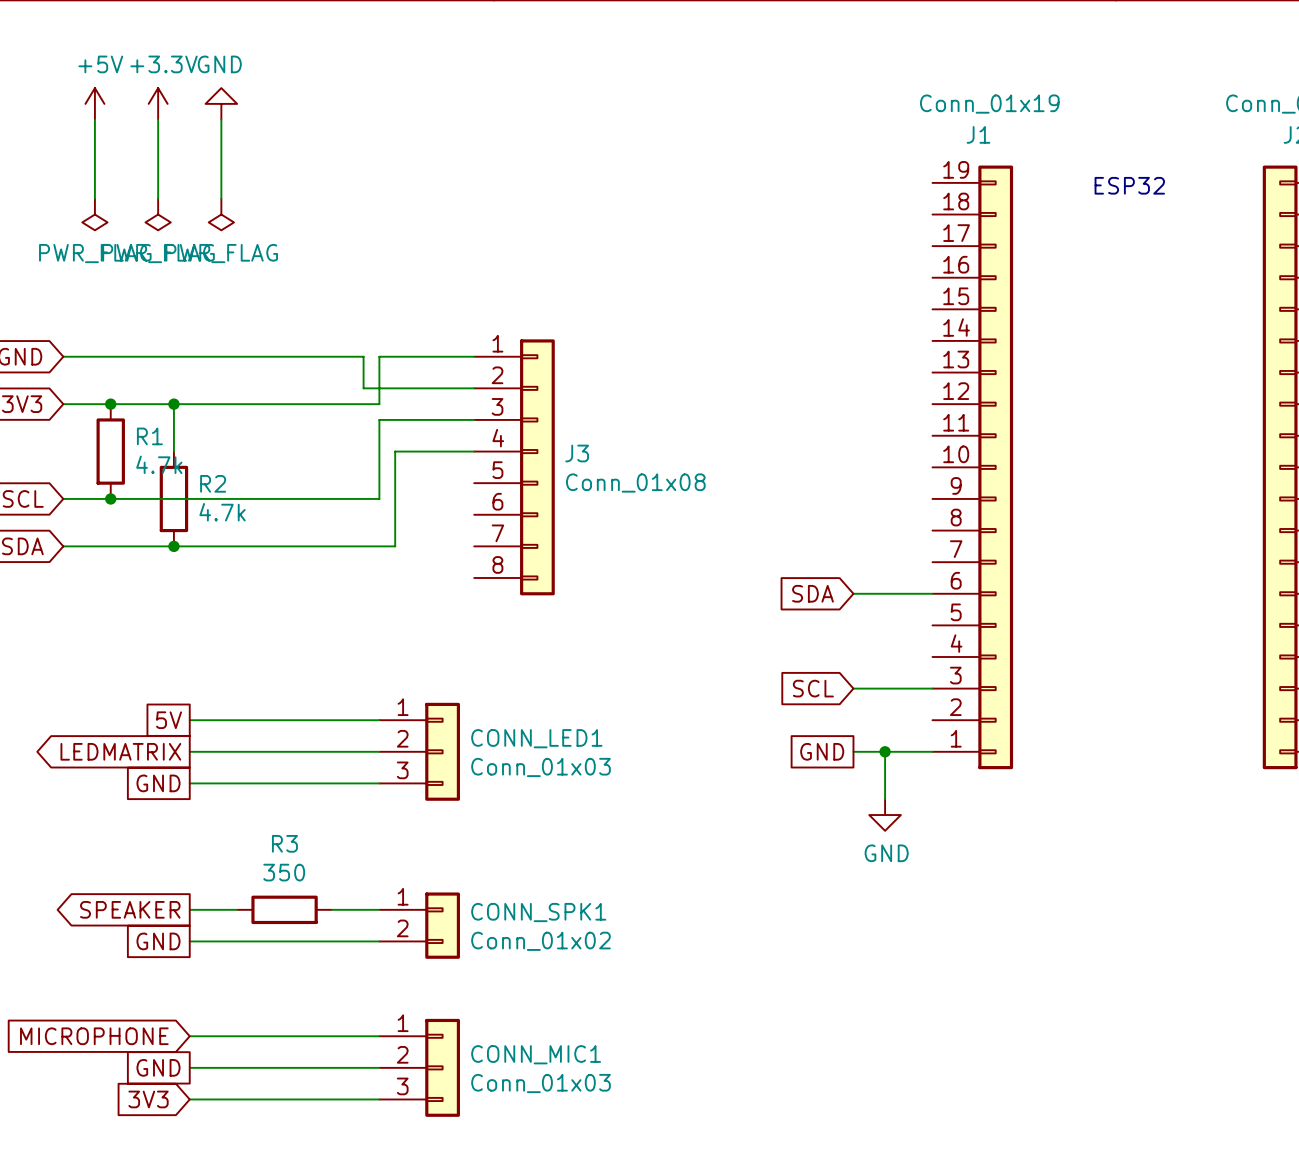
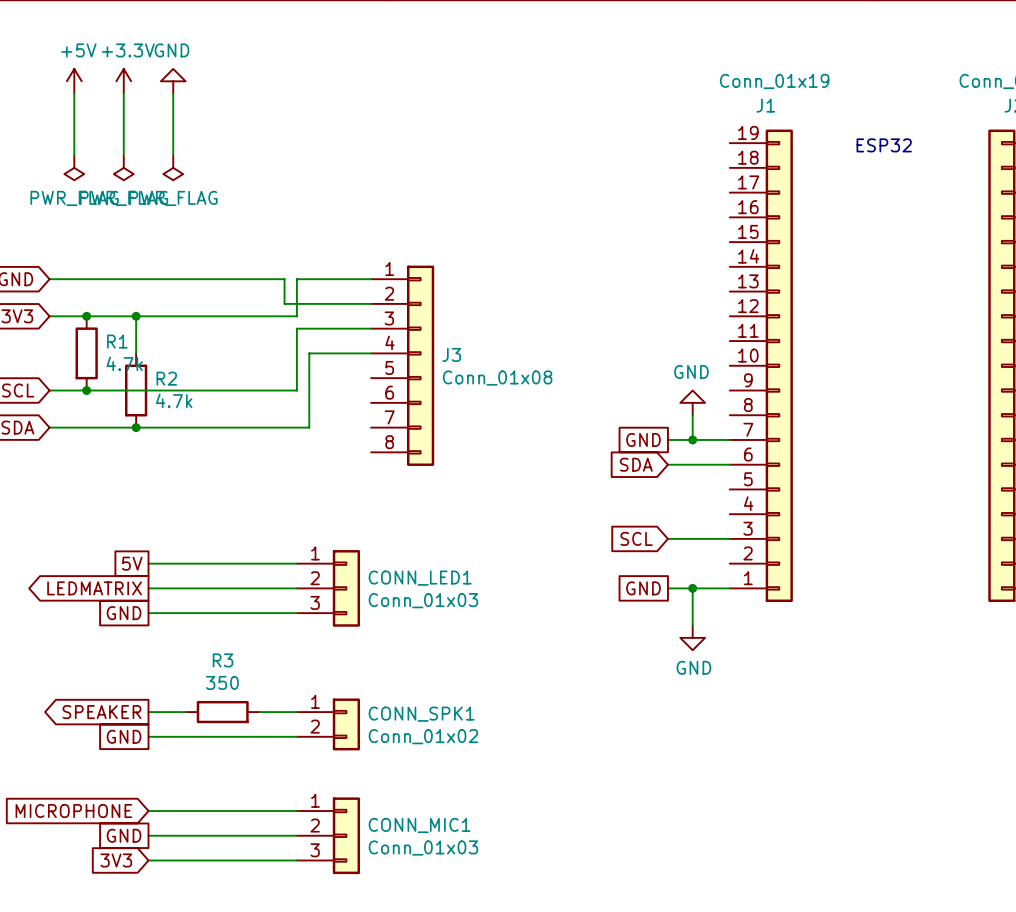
power symbol: none -> GND (692, 402)
wire: none -> (692, 415) (692, 439)
global label: none -> GND (643, 439)
wire: none -> (667, 439) (729, 439)
junction: none -> (692, 439)

